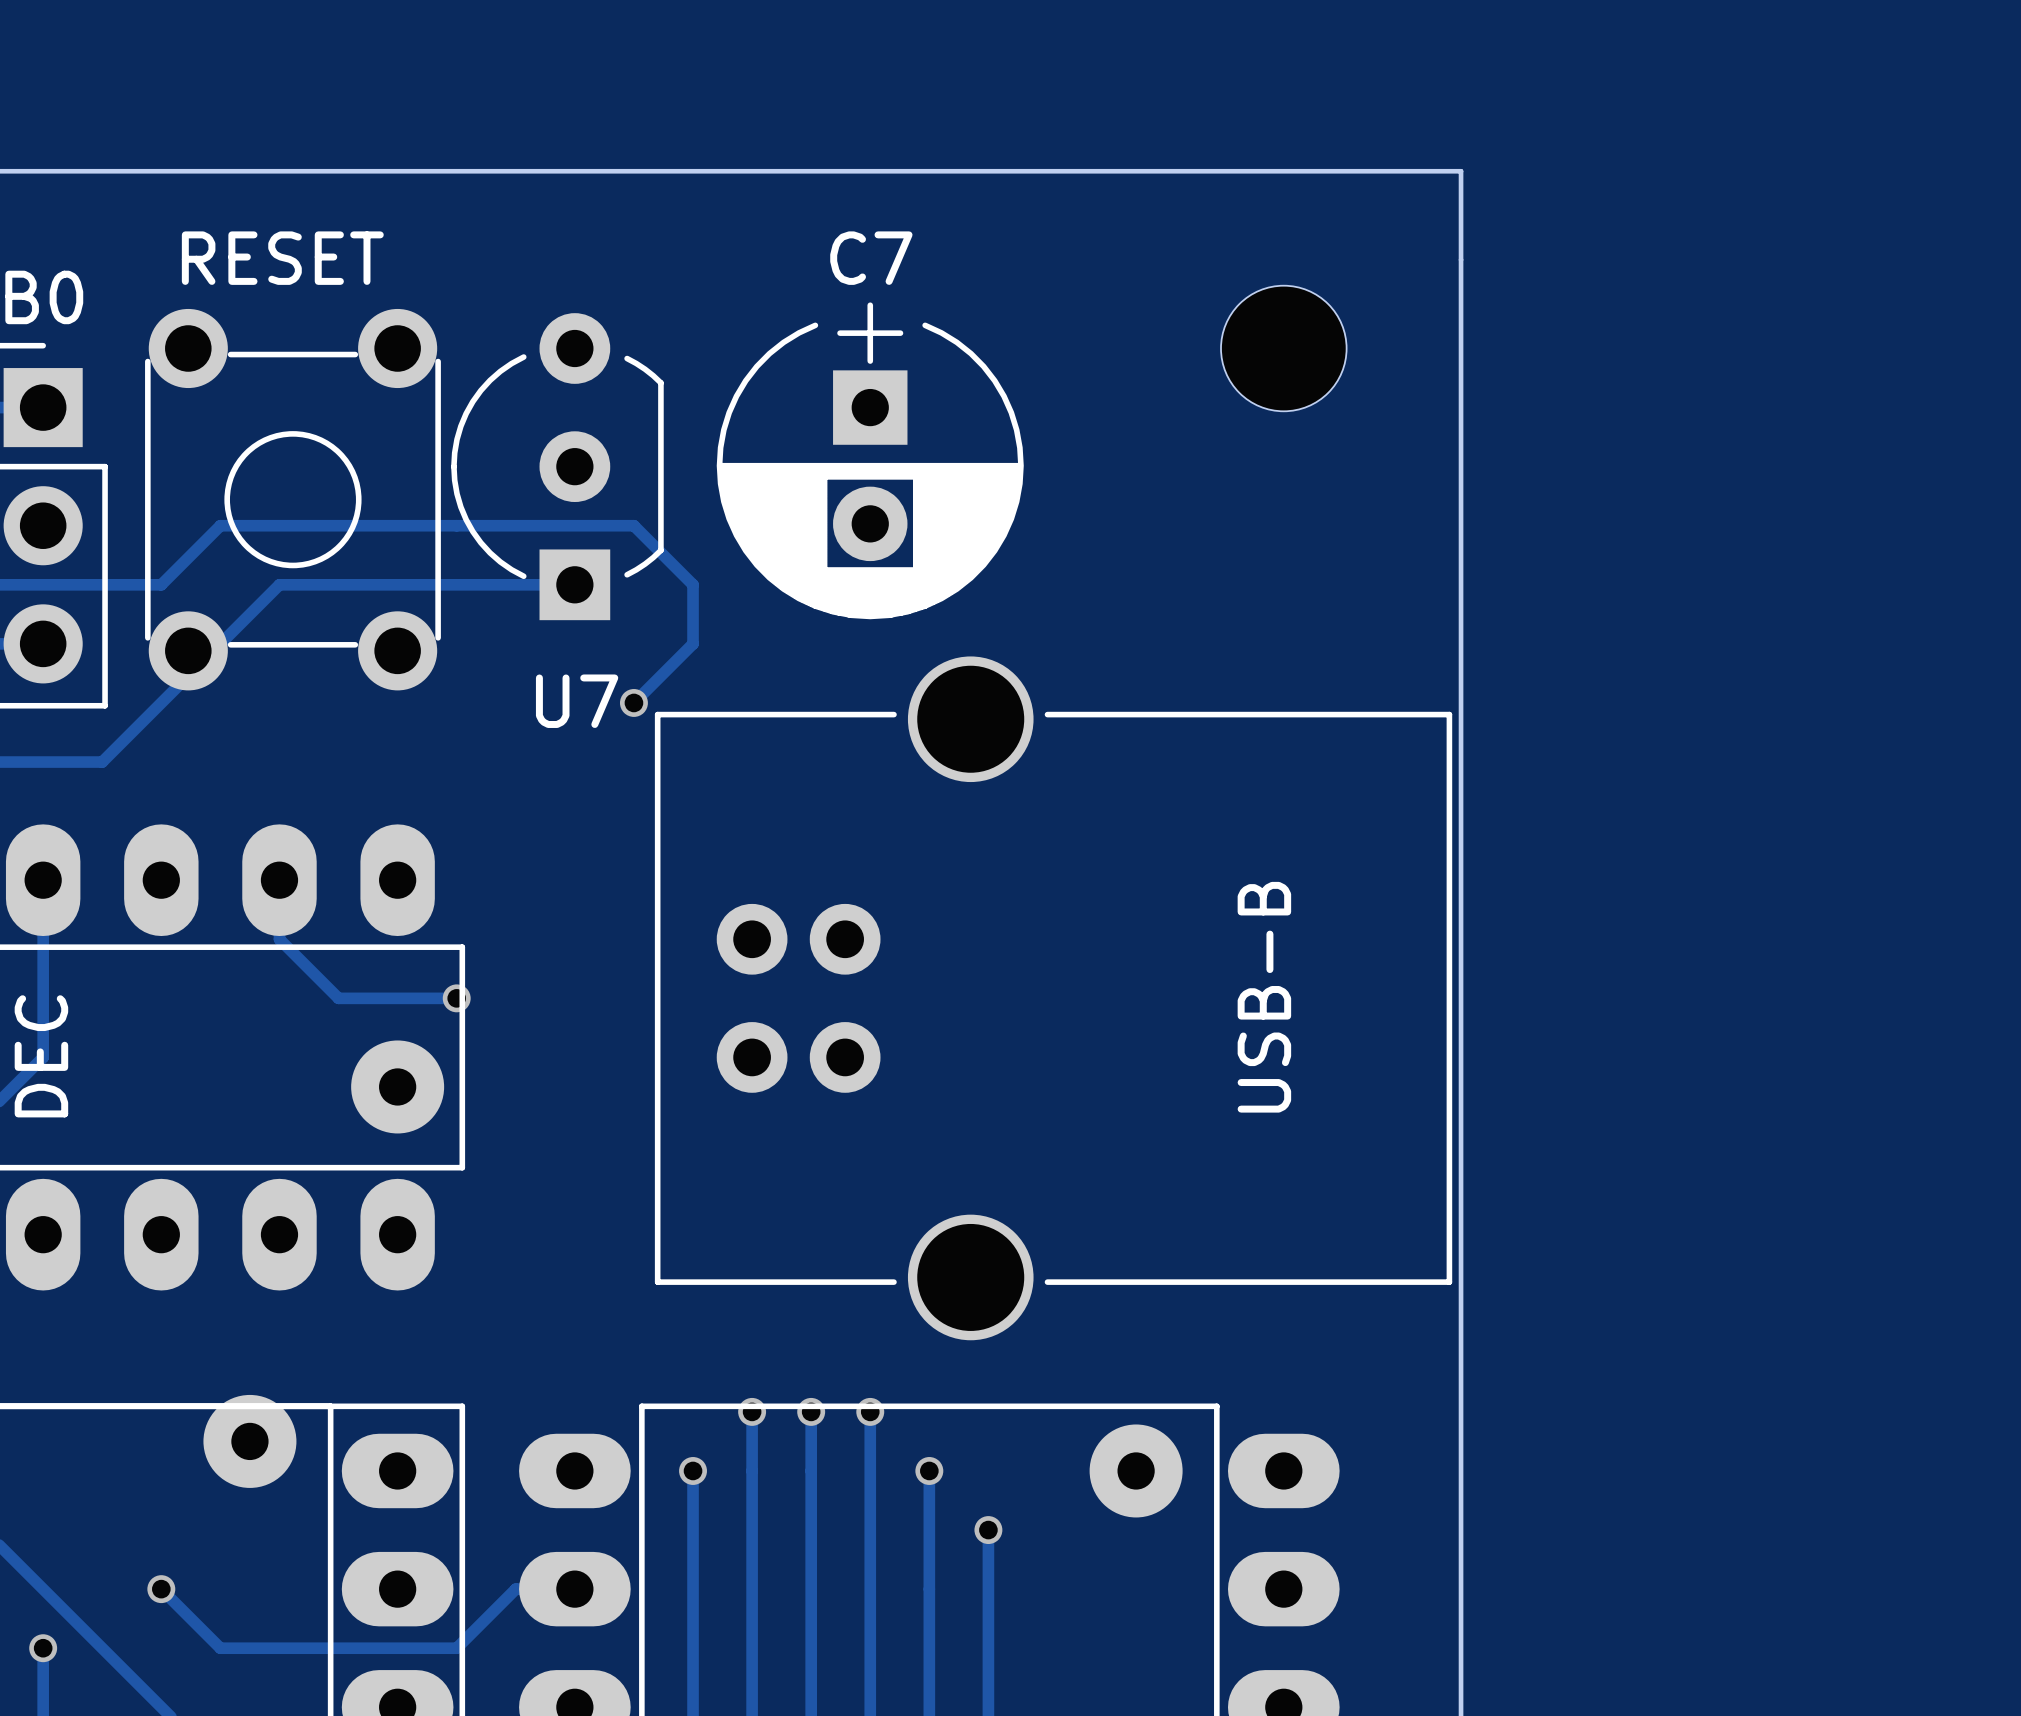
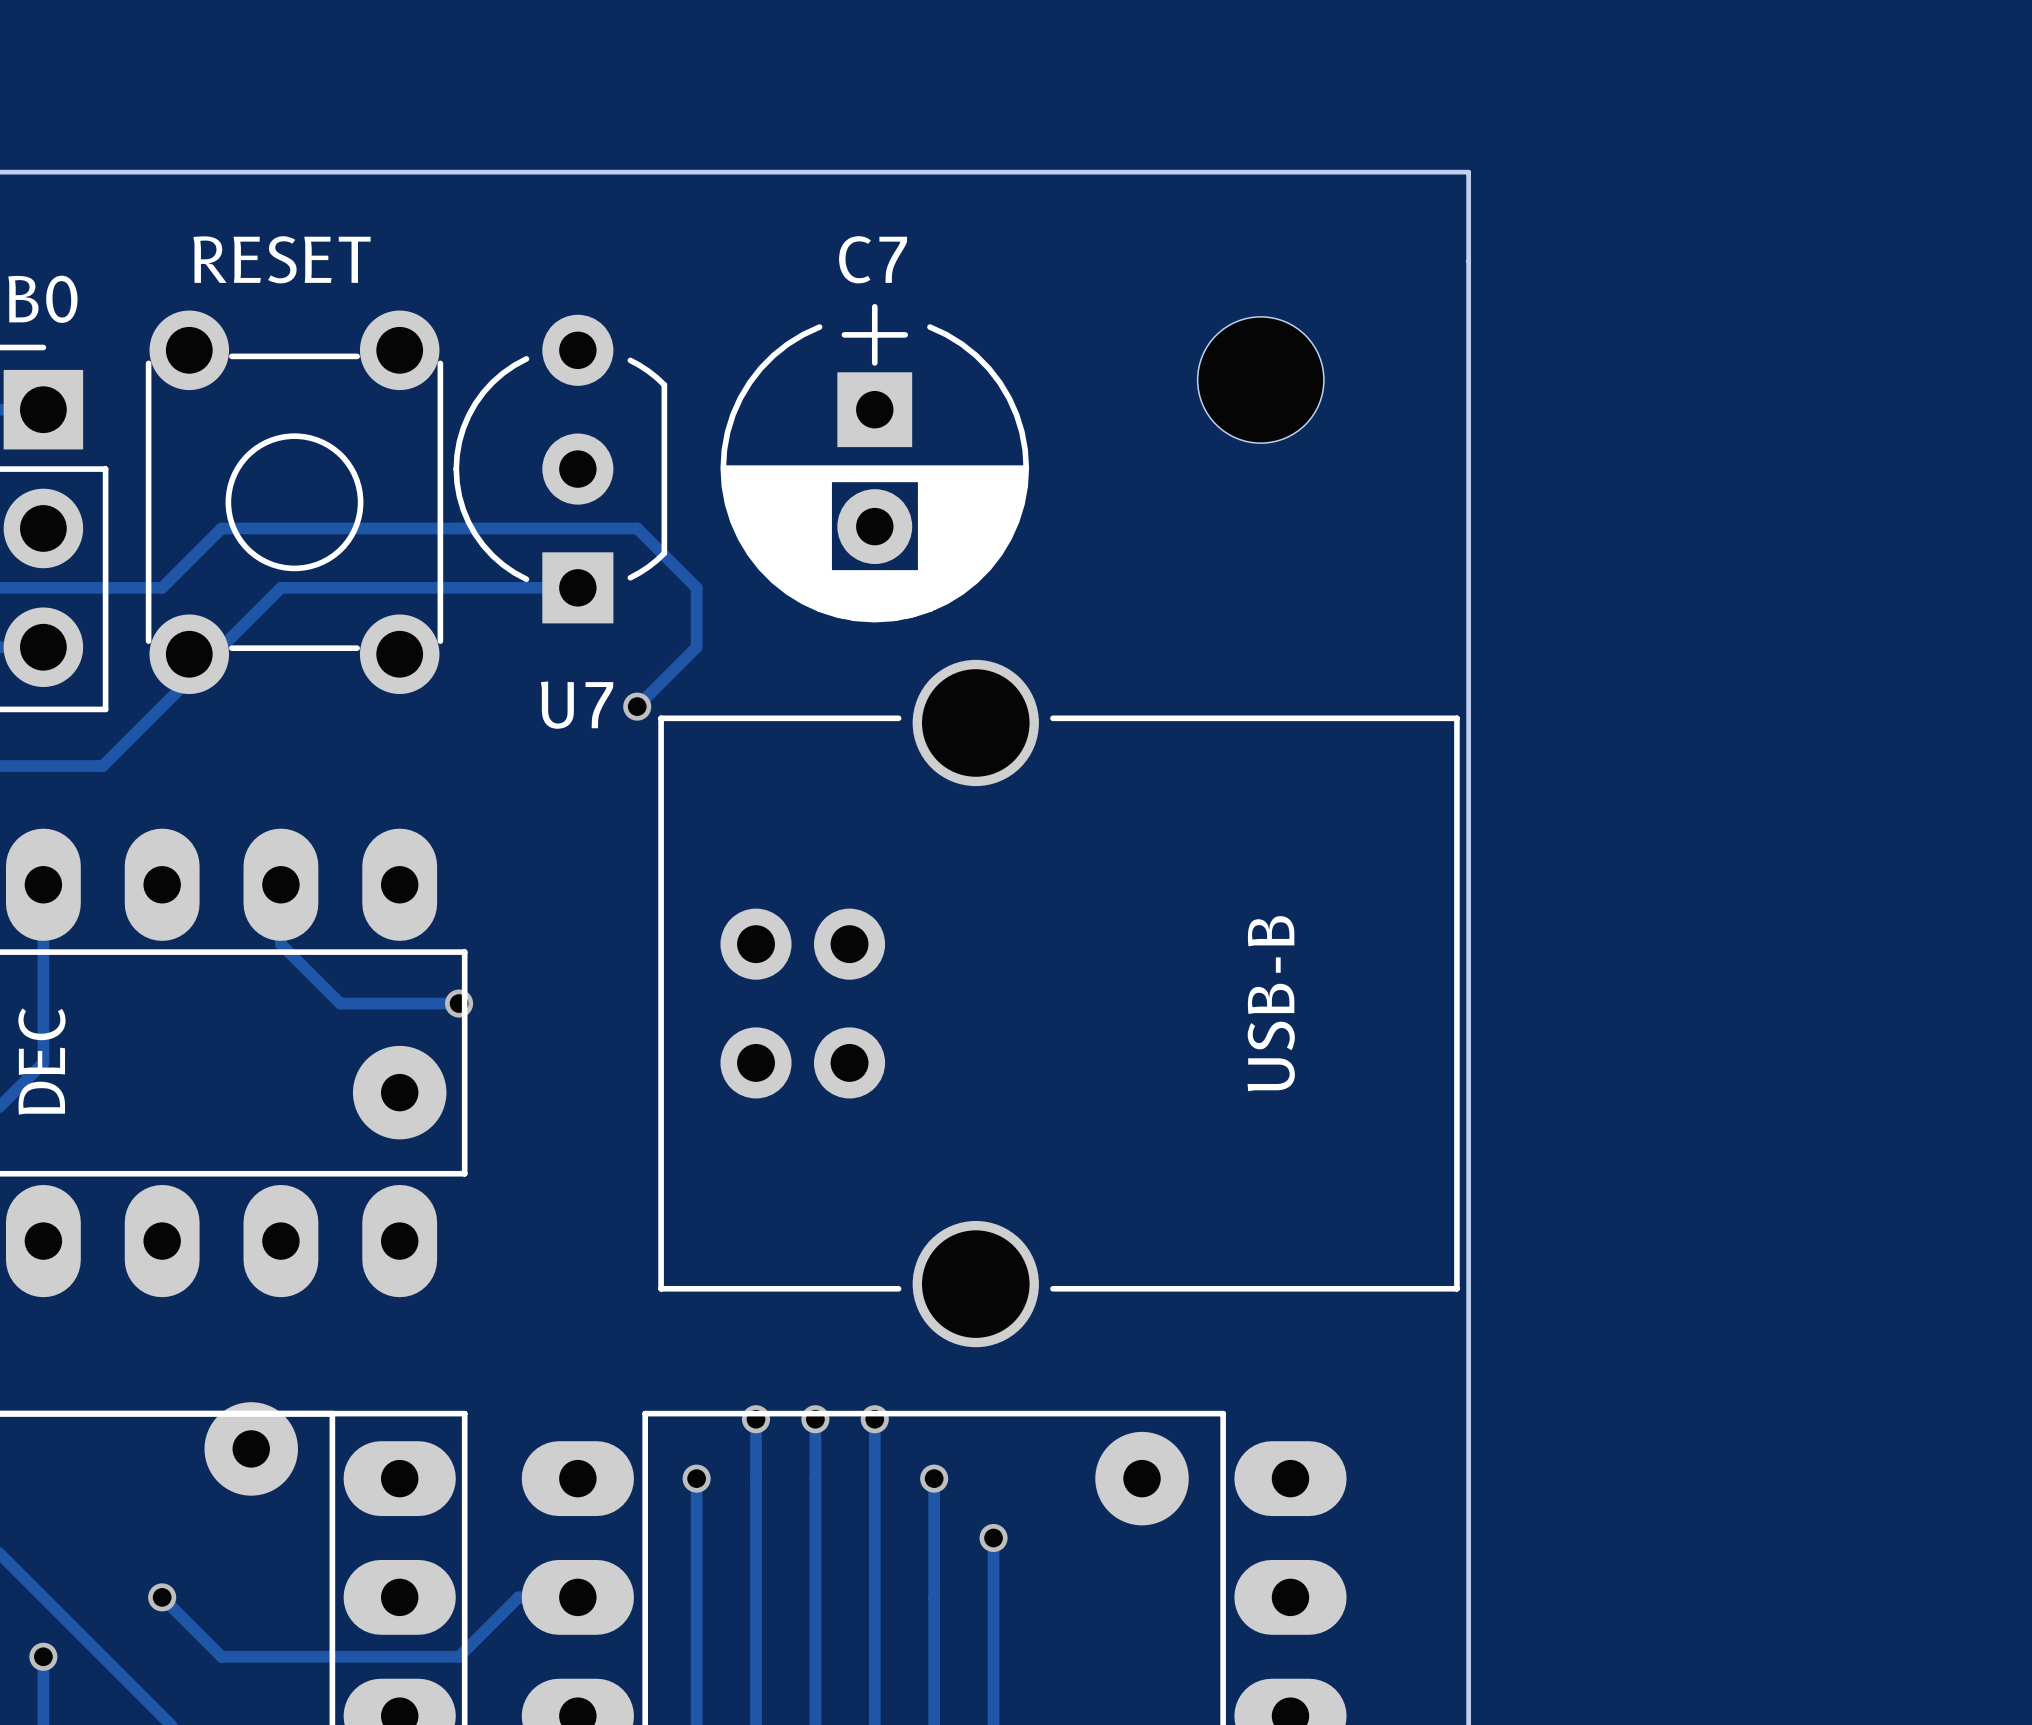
part position: (1283, 348) -> (1260, 380)

